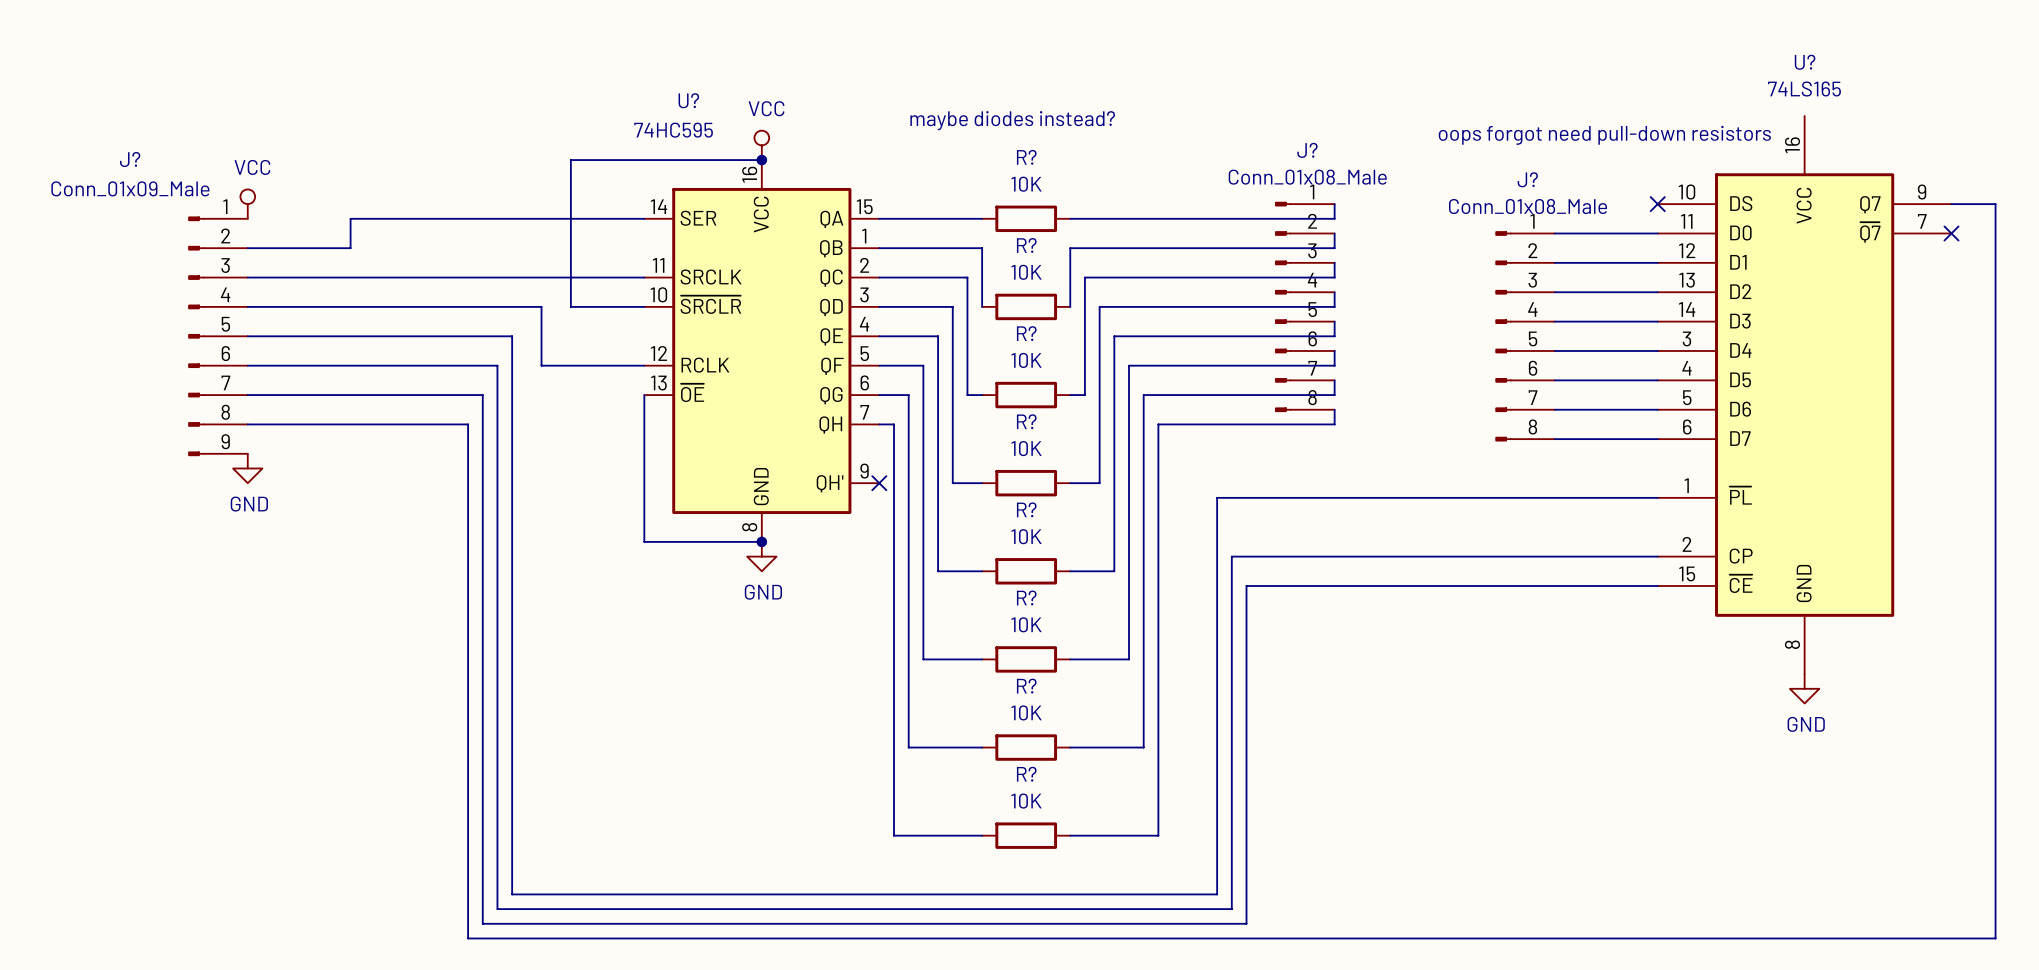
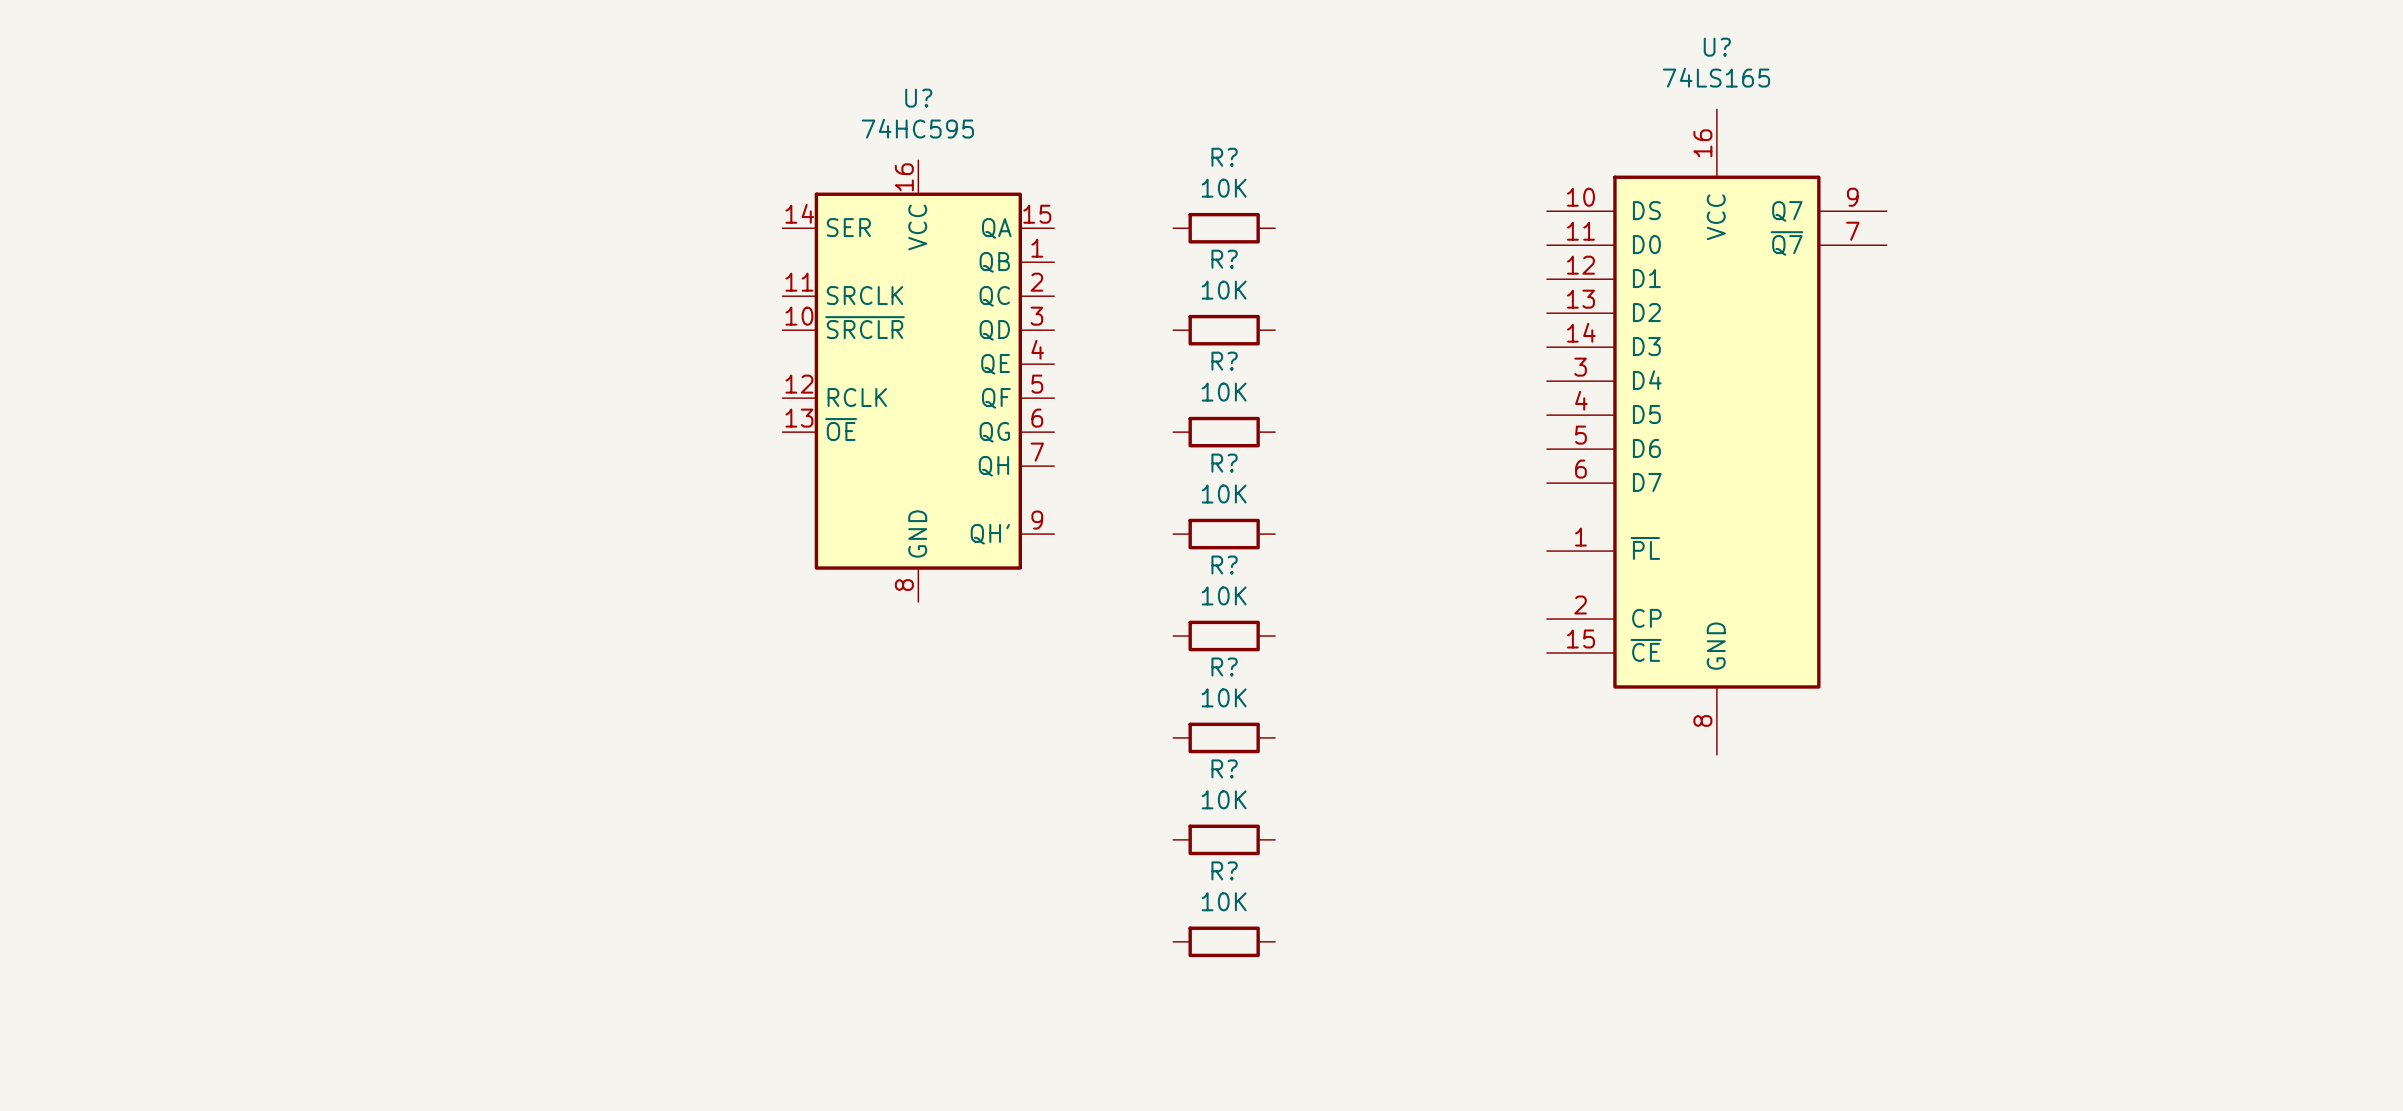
U? name position: U? (688, 100) -> U? (918, 98)
text: maybe diodes instead? (1012, 120) -> none
U? value position: 74HC595 (673, 130) -> 74HC595 (917, 128)
text: oops forgot need pull-down resistors (1604, 135) -> none
power symbol: VCC (761, 145) -> none
wire: (761, 160) (570, 160) (570, 306) (644, 306) -> none
junction: (761, 160) -> none
power symbol: VCC (247, 204) -> none
wire: (1334, 204) (1334, 218) (1070, 218) -> none
no-connect mark: (1657, 204) -> none
wire: (1951, 204) (1995, 204) (1995, 938) (468, 938) (468, 424) (247, 424) -> none
wire: (644, 218) (350, 218) (350, 248) (247, 248) -> none
wire: (879, 218) (982, 218) -> none
wire: (1334, 233) (1334, 248) (1070, 248) (1070, 306) -> none
wire: (1554, 233) (1657, 233) -> none
no-connect mark: (1951, 233) -> none
wire: (879, 248) (982, 248) (982, 306) -> none
wire: (1334, 262) (1334, 277) (1084, 277) (1084, 395) (1070, 395) -> none
wire: (1554, 262) (1657, 262) -> none
wire: (247, 277) (644, 277) -> none
wire: (879, 277) (967, 277) (967, 395) (982, 395) -> none
wire: (1334, 292) (1334, 306) (1099, 306) (1099, 483) (1070, 483) -> none
wire: (1554, 292) (1657, 292) -> none
wire: (247, 306) (541, 306) (541, 365) (644, 365) -> none
wire: (879, 306) (952, 306) (952, 483) (982, 483) -> none
J?: Conn_01x08_Male (1304, 306) -> none
wire: (1334, 321) (1334, 336) (1114, 336) (1114, 571) (1070, 571) -> none
wire: (1554, 321) (1657, 321) -> none
J?: Conn_01x09_Male (217, 336) -> none
wire: (247, 336) (512, 336) (512, 894) (1217, 894) (1217, 497) (1657, 497) -> none
wire: (879, 336) (938, 336) (938, 571) (982, 571) -> none
J?: Conn_01x08_Male (1525, 336) -> none
wire: (1334, 350) (1334, 365) (1129, 365) (1129, 659) (1070, 659) -> none
wire: (1554, 350) (1657, 350) -> none
wire: (247, 365) (497, 365) (497, 909) (1231, 909) (1231, 556) (1657, 556) -> none
wire: (879, 365) (923, 365) (923, 659) (982, 659) -> none
wire: (1334, 380) (1334, 395) (1143, 395) (1143, 747) (1070, 747) -> none
wire: (1554, 380) (1657, 380) -> none
wire: (247, 395) (482, 395) (482, 923) (1246, 923) (1246, 585) (1657, 585) -> none
wire: (644, 395) (644, 541) (761, 541) -> none
wire: (879, 395) (908, 395) (908, 747) (982, 747) -> none
U?: none -> 74LS165 (1716, 432)
U?: 74LS165 (1804, 395) -> none
wire: (1334, 409) (1334, 424) (1158, 424) (1158, 835) (1070, 835) -> none
wire: (1554, 409) (1657, 409) -> none
wire: (879, 424) (894, 424) (894, 835) (982, 835) -> none
wire: (1554, 439) (1657, 439) -> none
power symbol: GND (247, 468) -> none
no-connect mark: (879, 483) -> none
junction: (761, 541) -> none
power symbol: GND (761, 556) -> none
power symbol: GND (1804, 688) -> none

